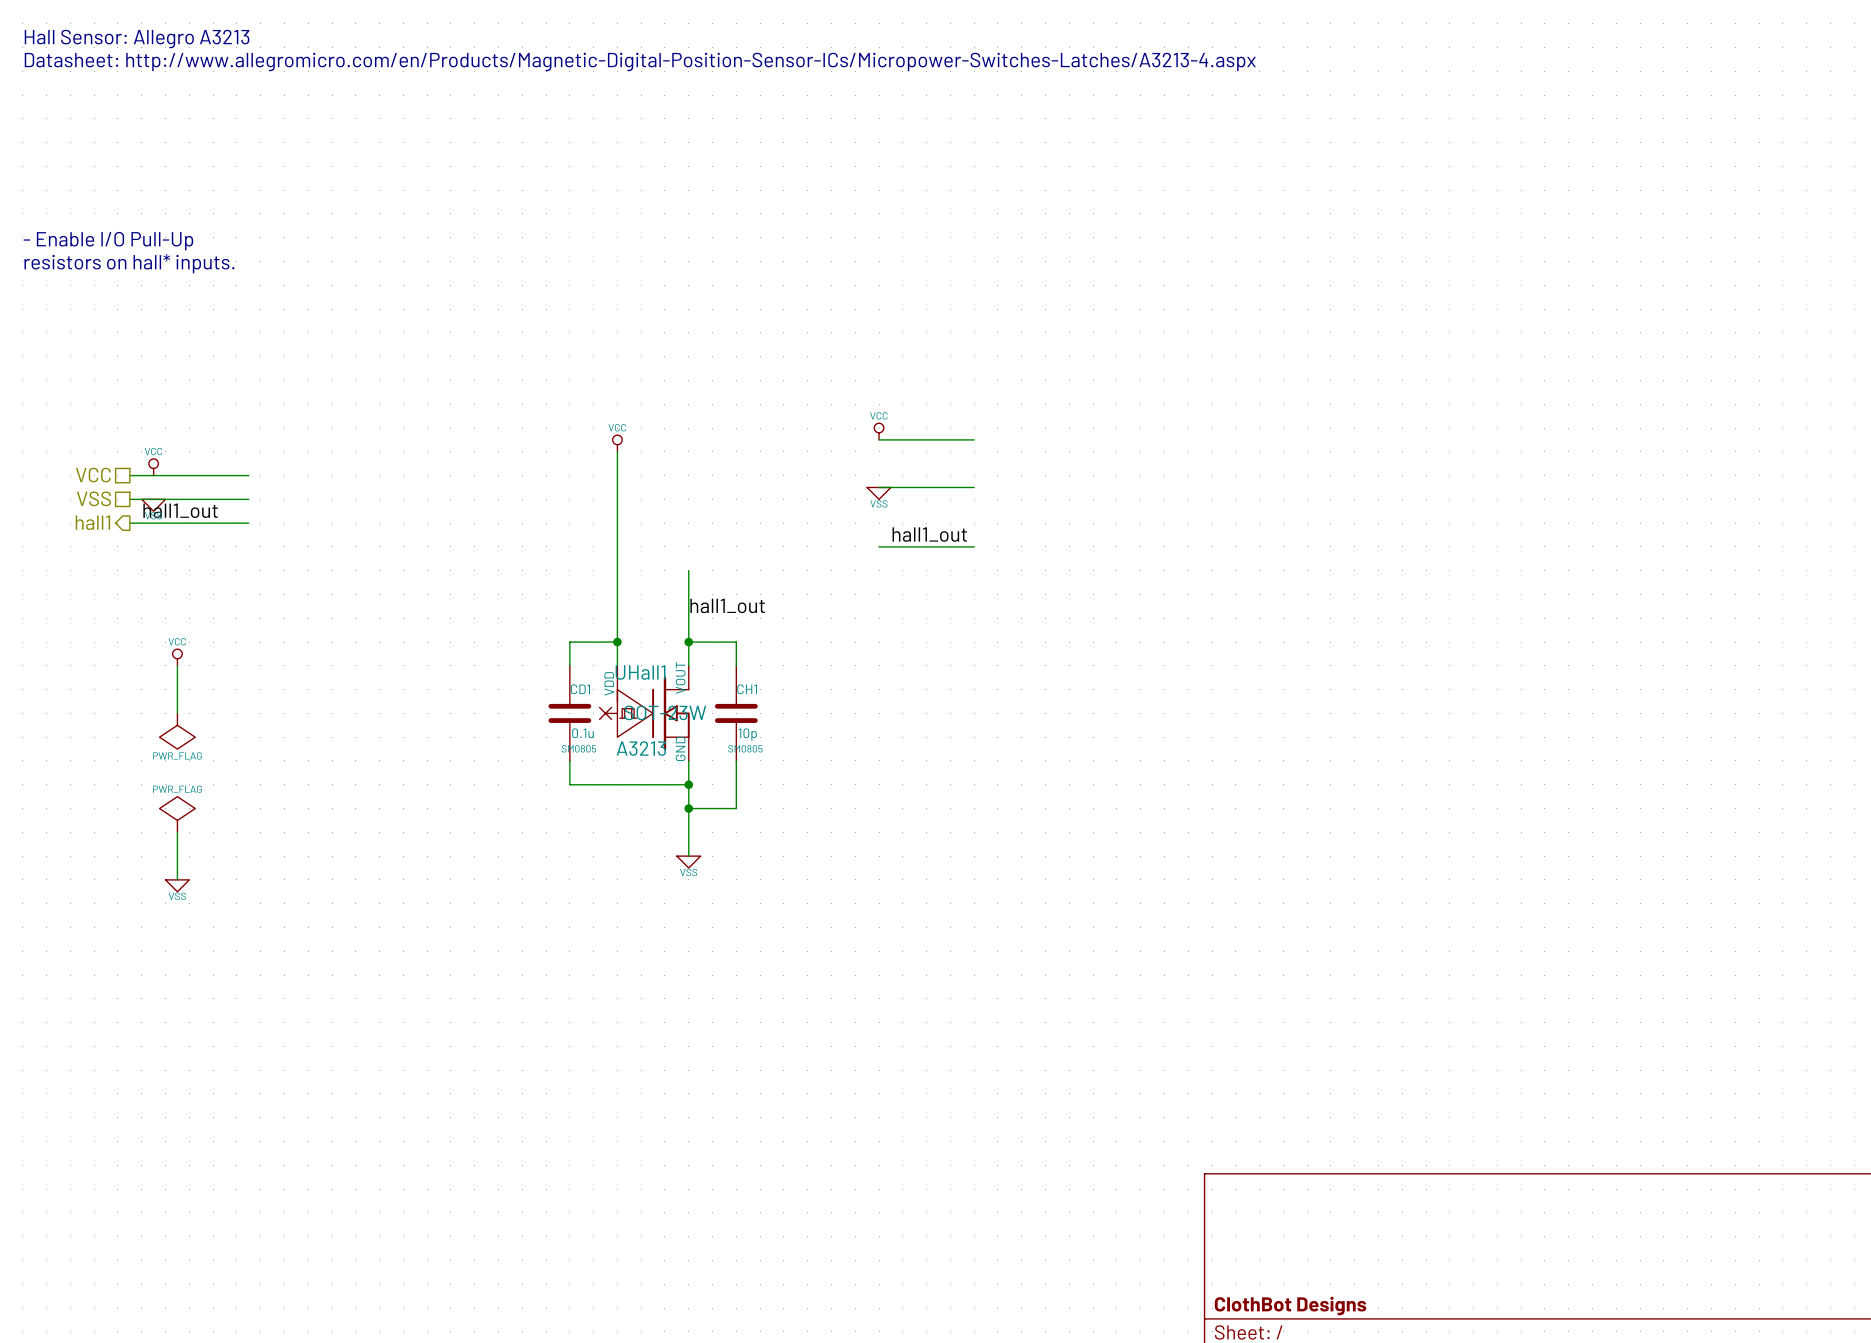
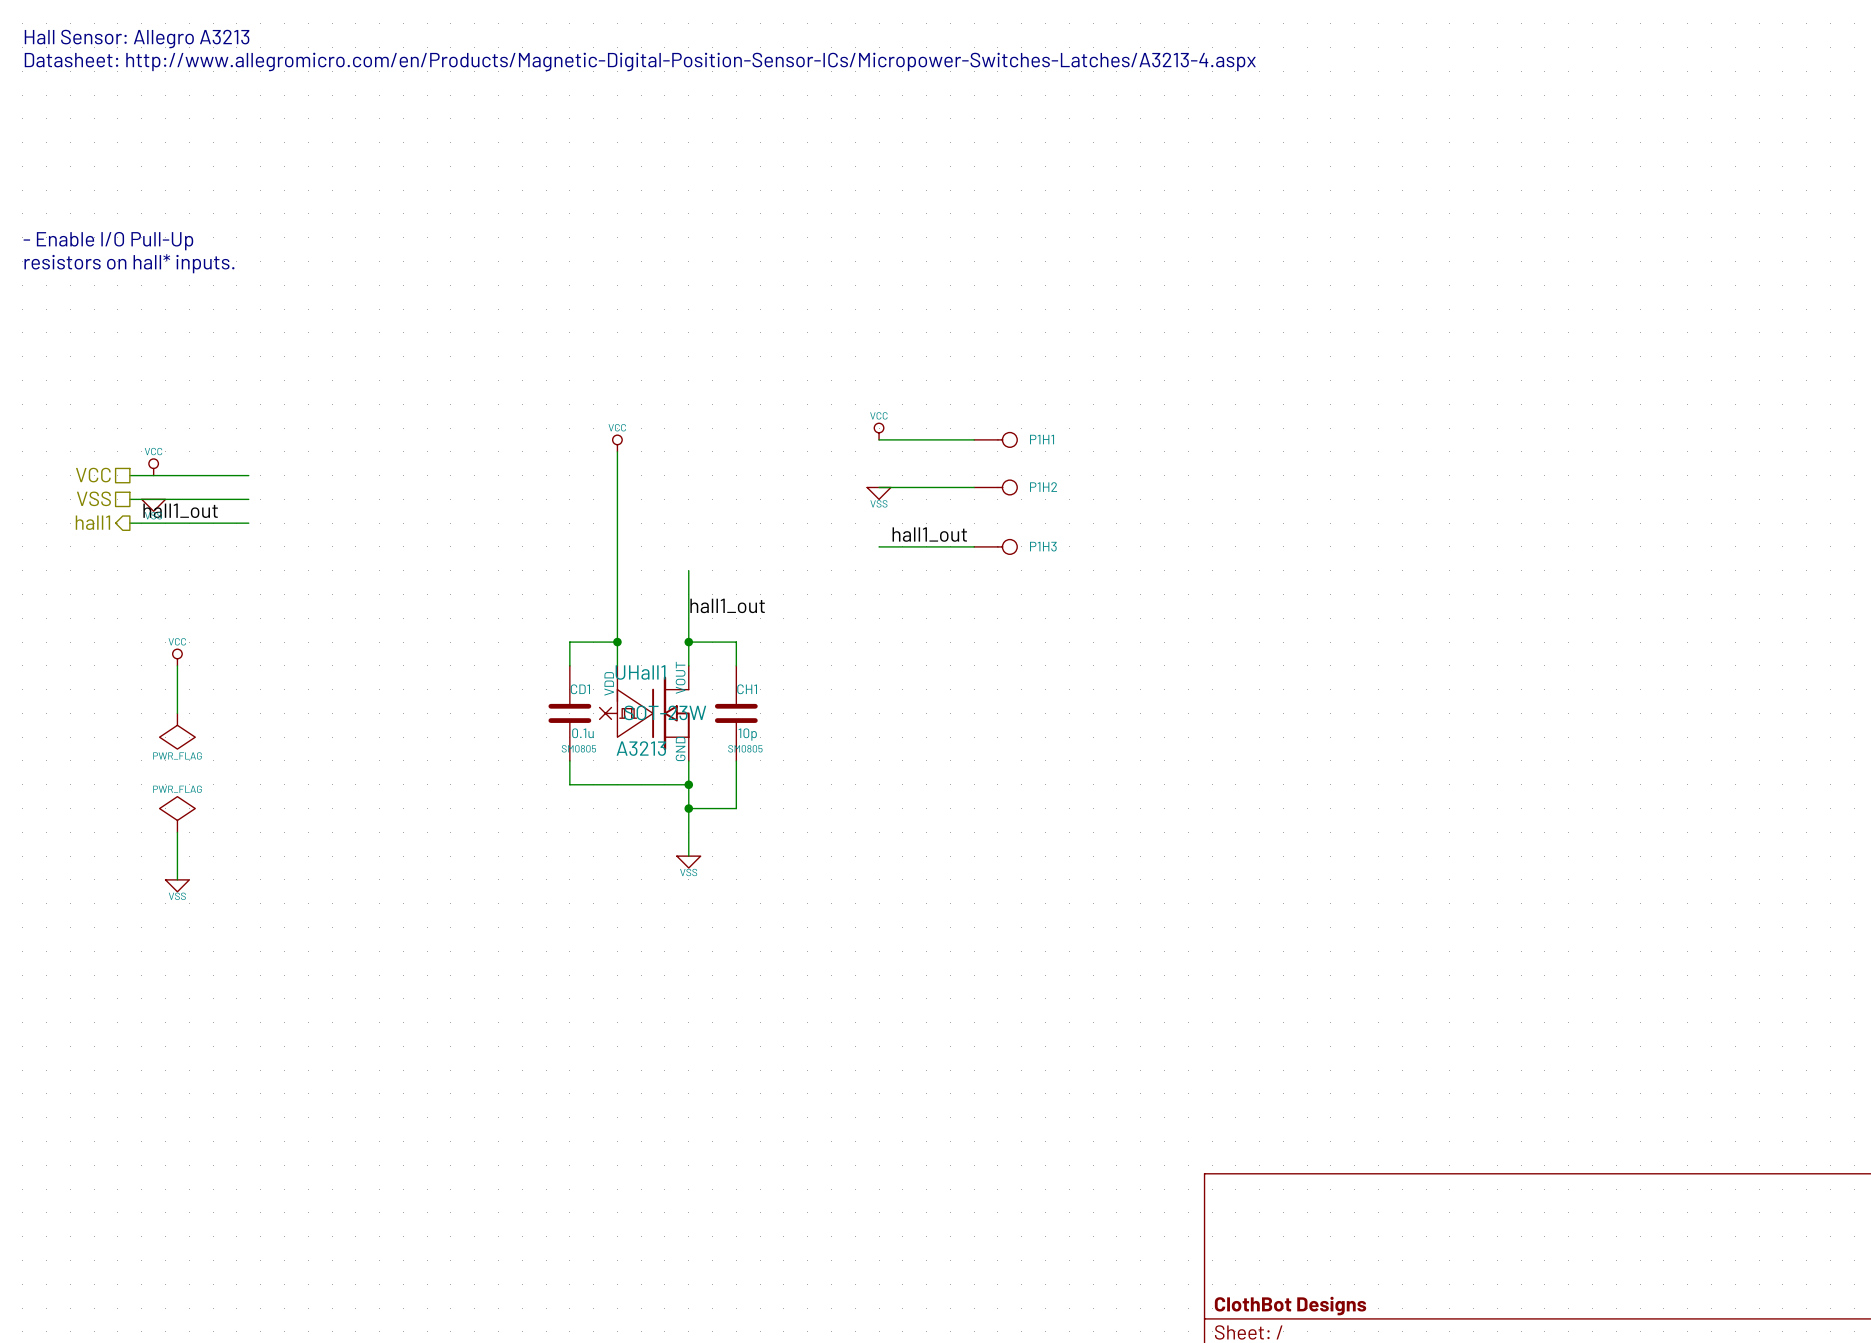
P1H1: none -> (995, 439)
P1H2: none -> (995, 487)
P1H3: none -> (995, 546)

